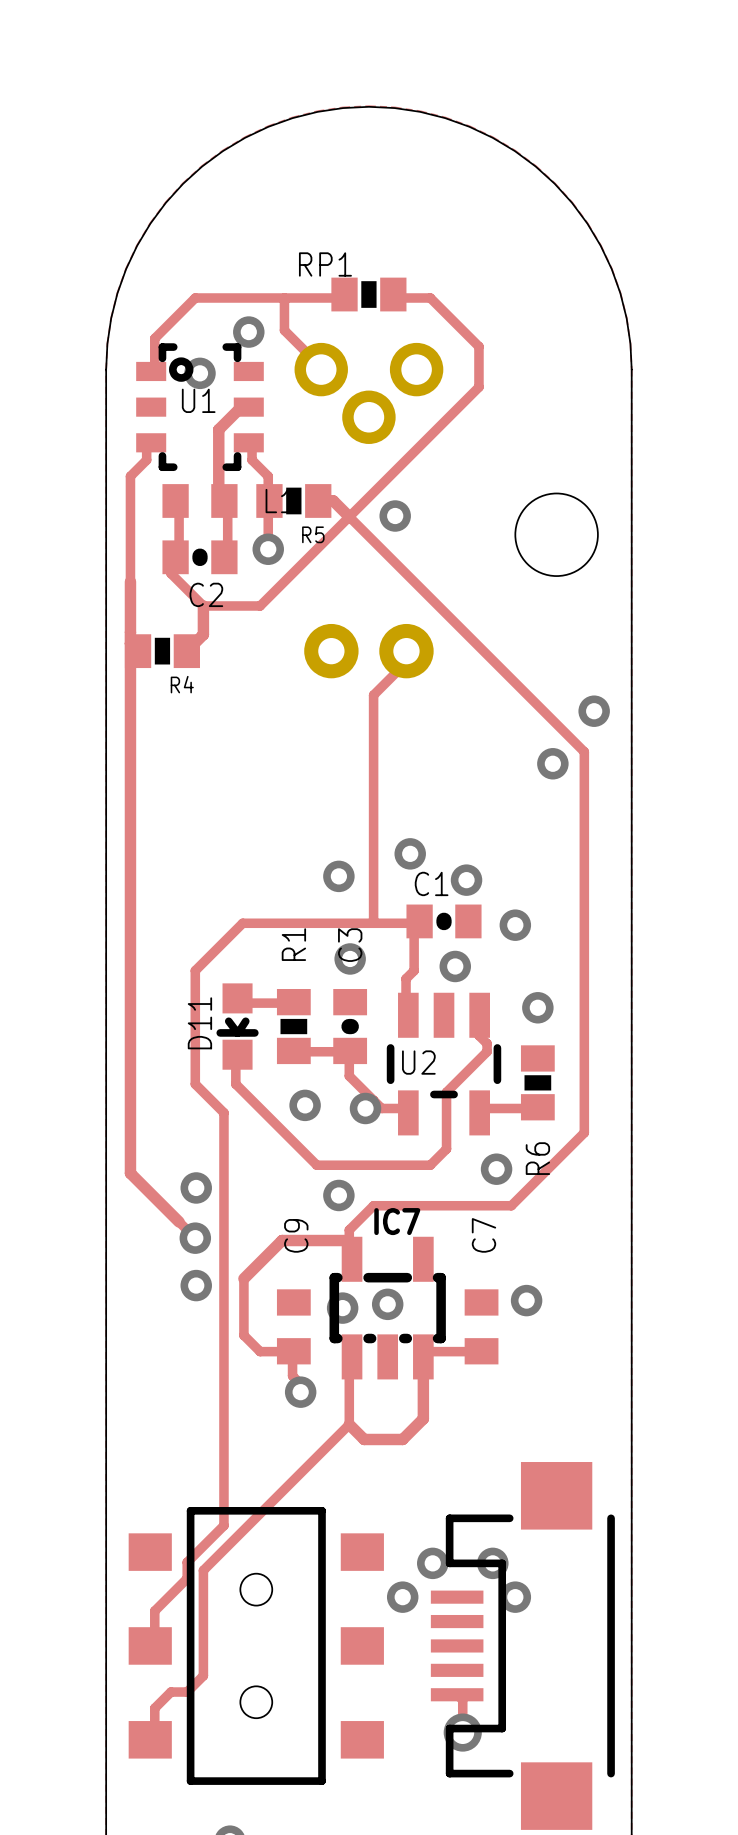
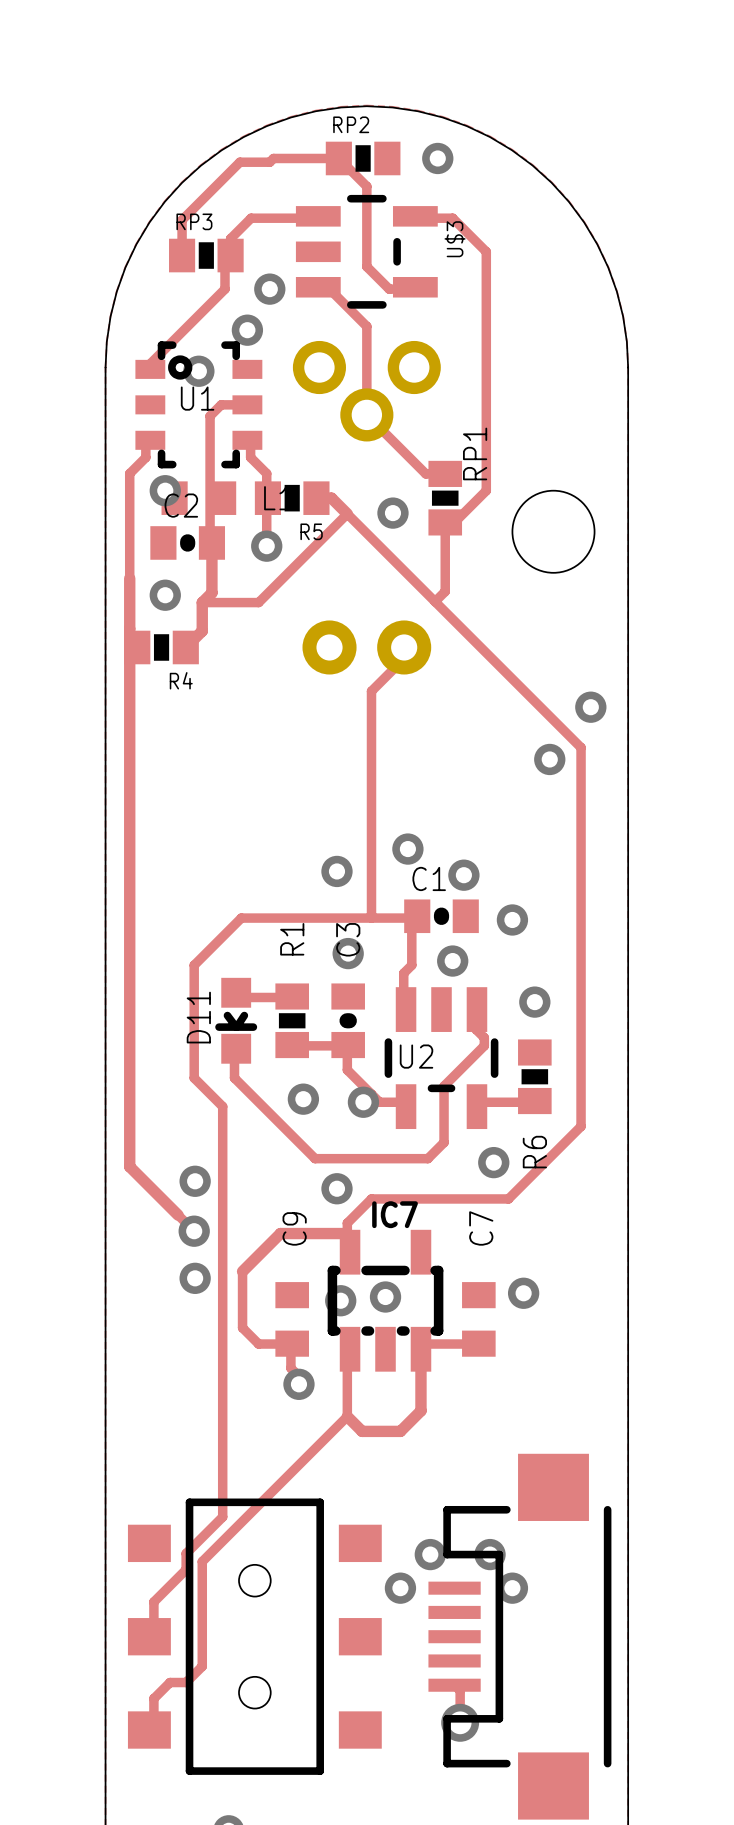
RP2: none -> (363, 158)
via: none -> (437, 158)
track: none -> (415, 216) (417, 218) (452, 218) (486, 251) (486, 490) (454, 522) (445, 522) (445, 591) (435, 601)
U$3: none -> (366, 251)
track: none -> (182, 255) (182, 220) (239, 162) (269, 162) (273, 158) (338, 158) (366, 186) (366, 266) (389, 289) (413, 289) (415, 287)
RP3: none -> (206, 255)
track: none -> (318, 287) (327, 287) (366, 326) (366, 414) (425, 473) (445, 473)
via: none -> (269, 289)
track: (344, 294) (341, 298) (195, 298) (154, 338) (154, 370) (151, 371) -> (318, 216) (316, 218) (251, 218) (230, 238) (230, 255) (225, 261) (225, 289) (150, 363) (150, 369)
RP1 rotation: 0° (368, 294) -> 90° clockwise (445, 498)
RP1 position: (368, 294) -> (445, 498)
track: (393, 294) (397, 298) (430, 298) (478, 346) (478, 387) (349, 516) -> none
track: (284, 298) (284, 330) (321, 369) -> none
track: (241, 407) (218, 429) (218, 495) (224, 500) (227, 508) (227, 549) (224, 557) -> (239, 404) (221, 404) (210, 416) (211, 592) (202, 602)
via: none -> (165, 490)
track: (175, 500) (179, 508) (179, 549) (175, 557) (170, 557) (170, 573) (203, 605) -> none
C2 position: (199, 557) -> (187, 542)
C2 name position: C2 (206, 594) -> C2 (181, 505)
via: none -> (165, 595)

